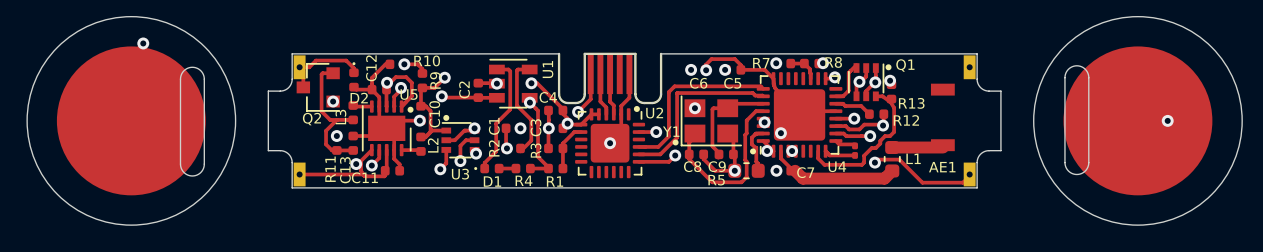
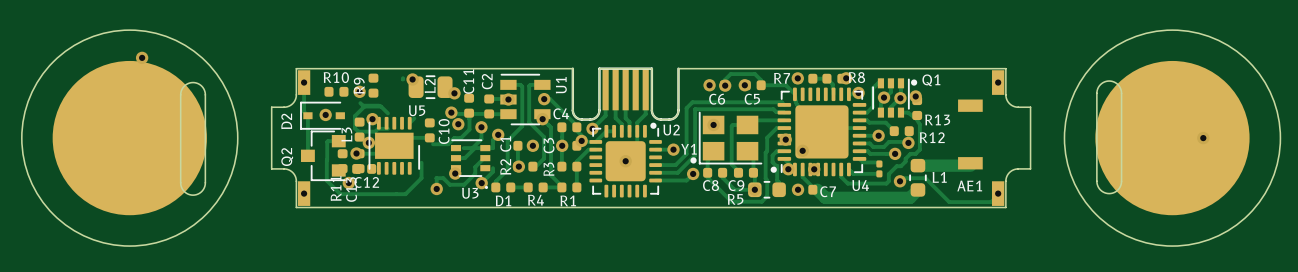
R10 name position: R10 (427, 60) -> R10 (336, 77)
D2 footprint: [349, 62, 359, 92] -> [300, 101, 345, 130]
track: none -> (403, 78) (402, 79)
track: (389, 64) (385, 64) (372, 77) (372, 89) (379, 97) (379, 120) (394, 135) (394, 158) (399, 164) (399, 170) -> none
R10 position: (397, 64) -> (336, 91)
track: (404, 64) (417, 64) (422, 69) (422, 73) -> none
track: none -> (304, 82) (304, 111) (307, 115) (307, 155)
C12 name rotation: 0° (371, 68) -> 90° clockwise (366, 182)
C12 name position: C12 (371, 68) -> C12 (366, 182)
track: (353, 72) (353, 68) (346, 60) (315, 60) (309, 67) (299, 67) (303, 71) (303, 87) -> none
track: (333, 73) (321, 74) (321, 111) (330, 119) (353, 119) -> none
via: none -> (359, 91)
track: (444, 77) (434, 87) (420, 89) (420, 106) (425, 106) (430, 111) (430, 132) -> none
R9 position: (422, 80) -> (373, 85)
R9 name position: R9 (435, 80) -> R9 (359, 85)
via: (387, 82) -> none
Q2 position: (318, 87) -> (323, 155)
track: (401, 87) (394, 96) (394, 106) -> none
via: (401, 87) -> none
C12 position: (379, 89) -> (364, 168)
C2 name position: C2 (464, 89) -> C2 (487, 81)
track: none -> (469, 113) (469, 129) (460, 138) (454, 138) (448, 144) (433, 144)
track: none -> (387, 113) (381, 106) (364, 106) (354, 116) (354, 128) (358, 131) (375, 131) (378, 128) (387, 128)
D2 name position: D2 (359, 98) -> D2 (286, 121)
via position: (333, 101) -> (325, 114)
via: none -> (372, 119)
track: (353, 105) (371, 106) -> none
track: (386, 106) (386, 86) (395, 77) (406, 77) (411, 82) (411, 96) (401, 106) -> none
drawing: [407, 106, 414, 113] -> none
via: none -> (458, 124)
track: none -> (481, 127) (481, 139) (472, 148) (463, 148)
via: none -> (481, 127)
drawing: [443, 114, 450, 121] -> none
track: none -> (498, 134) (493, 140) (493, 148) (485, 148)
via: none -> (498, 134)
Q2 name rotation: 0° (311, 119) -> 90° counterclockwise (287, 157)
Q2 name position: Q2 (311, 119) -> Q2 (287, 157)
track: (336, 119) (326, 130) (326, 144) (332, 150) (353, 150) -> none
via: (419, 120) -> none
track: none -> (338, 141) (327, 141) (326, 180) (340, 194) (405, 194) (421, 178) (421, 162)
via: none -> (368, 142)
via: (474, 128) -> none
track: (446, 130) (432, 130) (425, 136) (420, 136) -> none
L2 footprint: [416, 132, 426, 156] -> [408, 75, 453, 100]
via position: (336, 136) -> (356, 153)
track: (473, 140) (466, 140) (460, 145) (460, 161) -> (484, 158) (475, 167) (475, 173) (464, 184) (449, 184) (443, 178) (436, 178) (436, 188)
track: (447, 149) (446, 163) (440, 169) -> none
track: none -> (493, 168) (493, 171) (481, 183)
track: (371, 150) (361, 160) (361, 170) (364, 175) -> none
track: (379, 150) (379, 158) (371, 165) -> none
track: (386, 150) (385, 175) (364, 175) -> none
track: (401, 150) (420, 151) -> none
via: (476, 153) -> none
via: none -> (455, 173)
via: (460, 161) -> none
via position: (356, 164) -> (348, 183)
via: none -> (481, 183)
via: (371, 165) -> none
via: (440, 169) -> none
C11 rotation: 0° (392, 170) -> 90° clockwise (469, 105)
C11 position: (392, 170) -> (469, 105)
via: none -> (436, 188)
track: (299, 174) (364, 175) -> none

